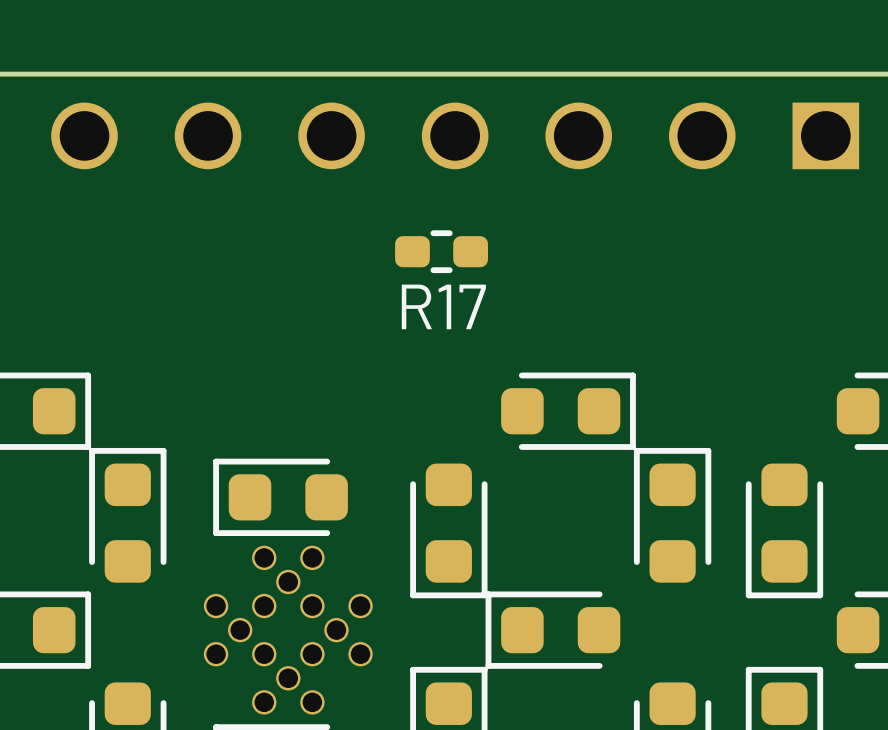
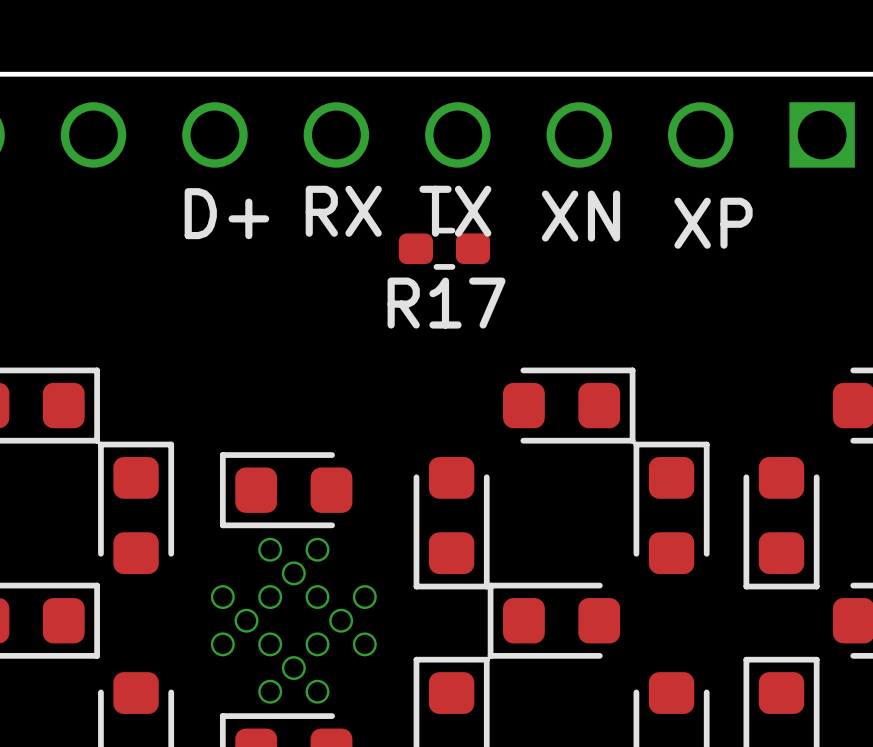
text: none -> RX (343, 211)
text: none -> TX (455, 211)
text: none -> D+ (226, 213)
text: none -> XN (581, 216)
text: none -> XP (713, 223)

